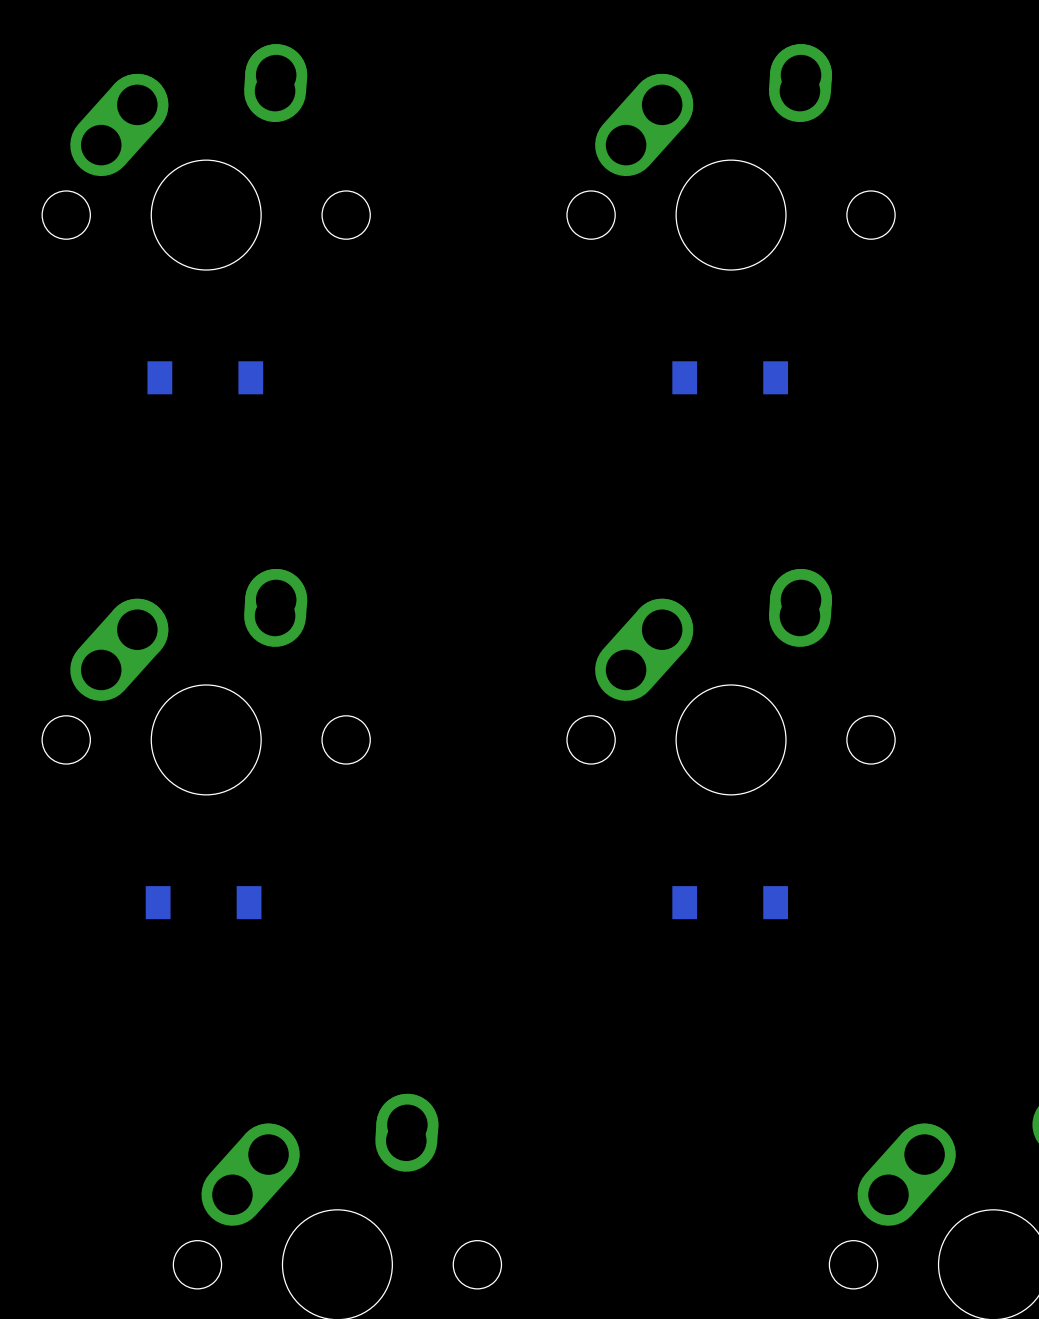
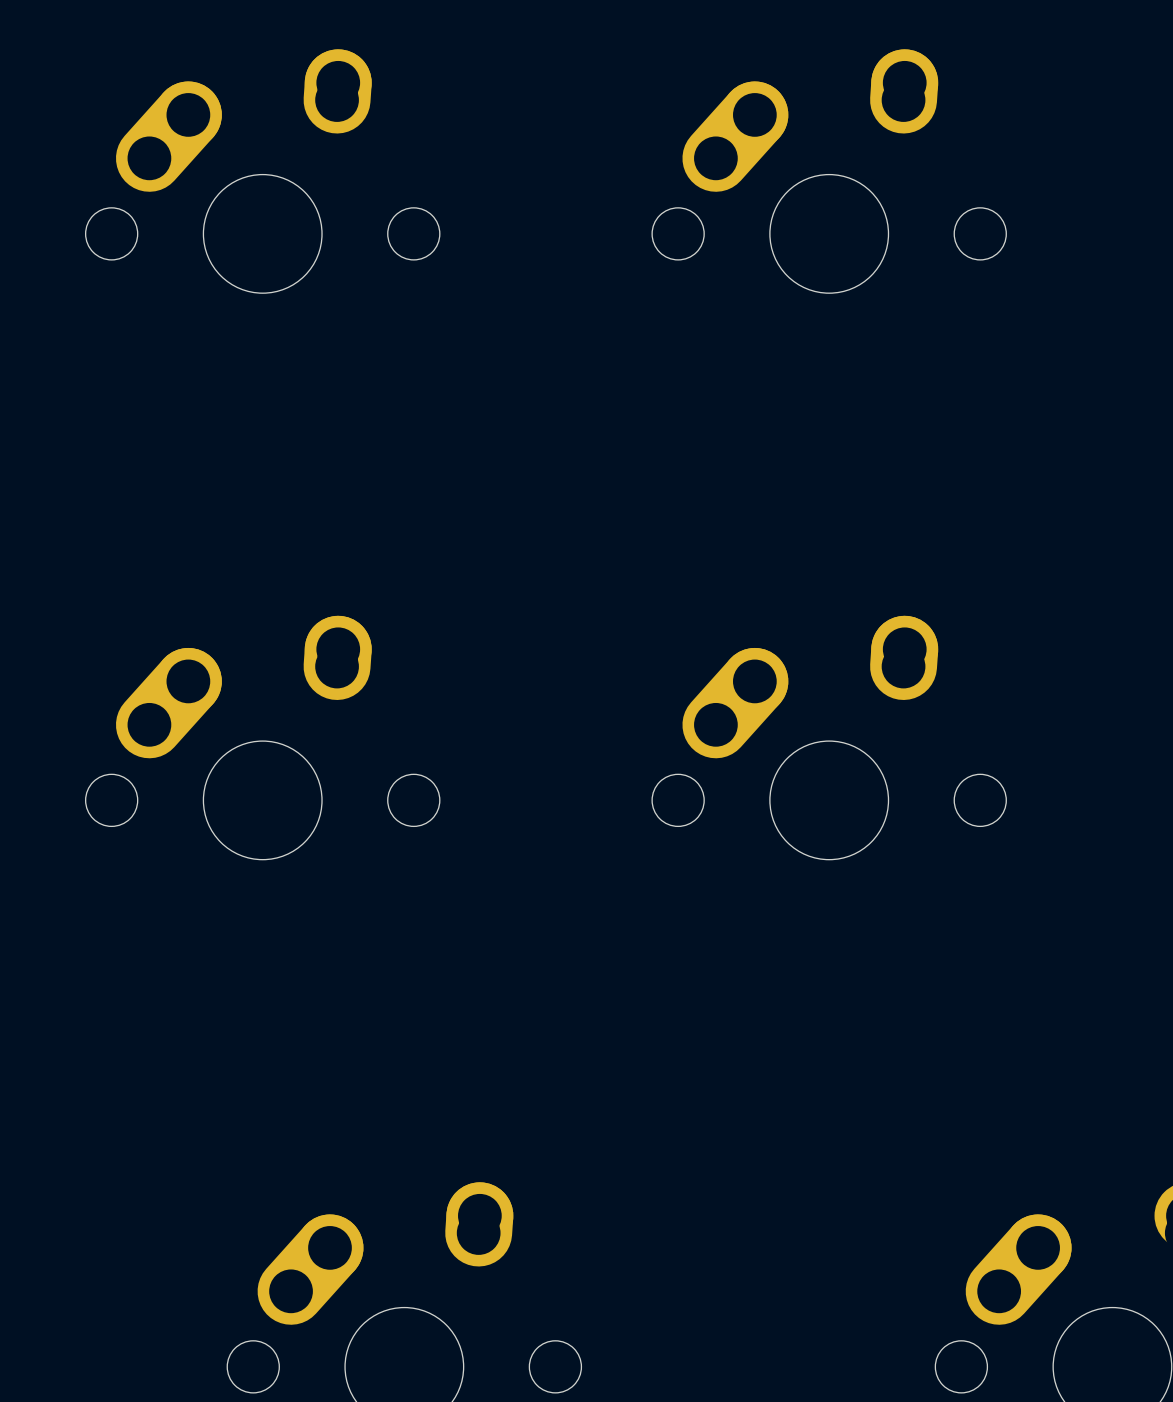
part: (205, 377) -> none
part: (730, 377) -> none
part: (203, 902) -> none
part: (730, 902) -> none

